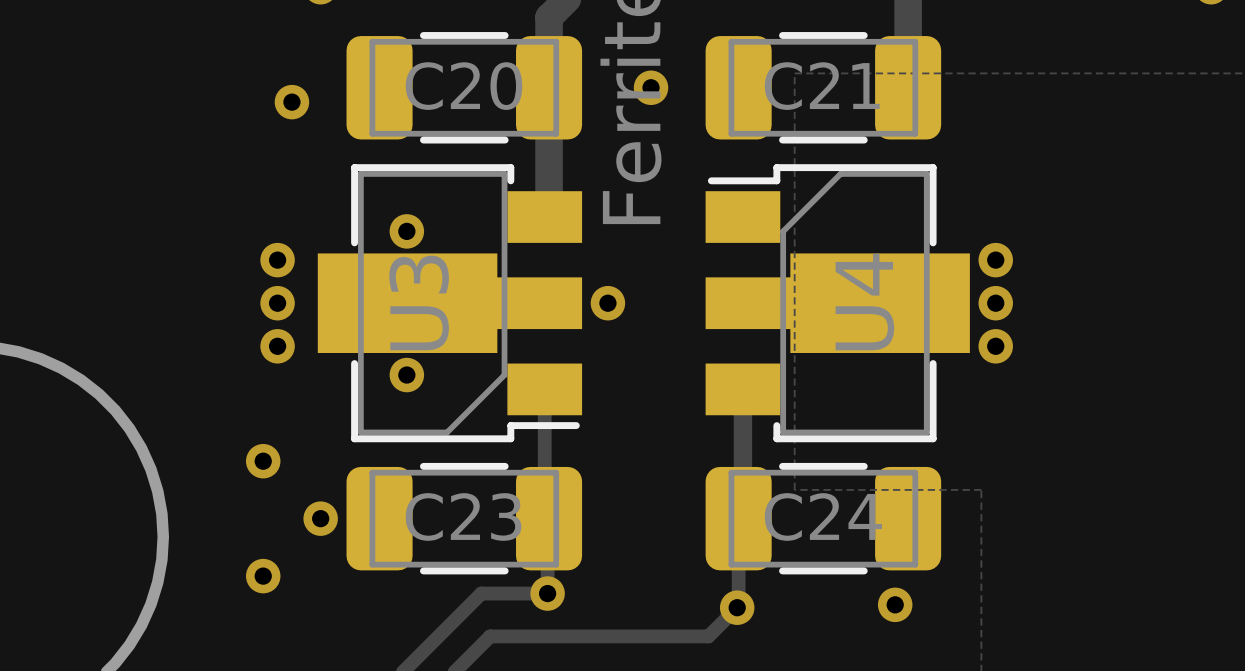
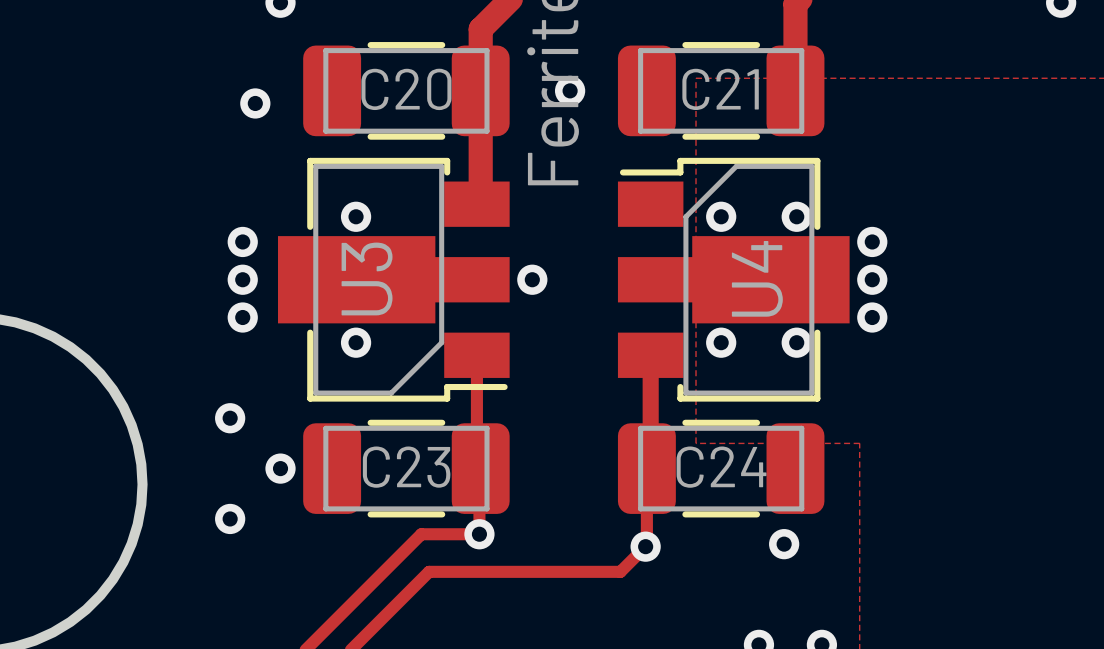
via: none -> (721, 216)
via: none -> (796, 216)
via: none -> (721, 342)
via: none -> (796, 342)

